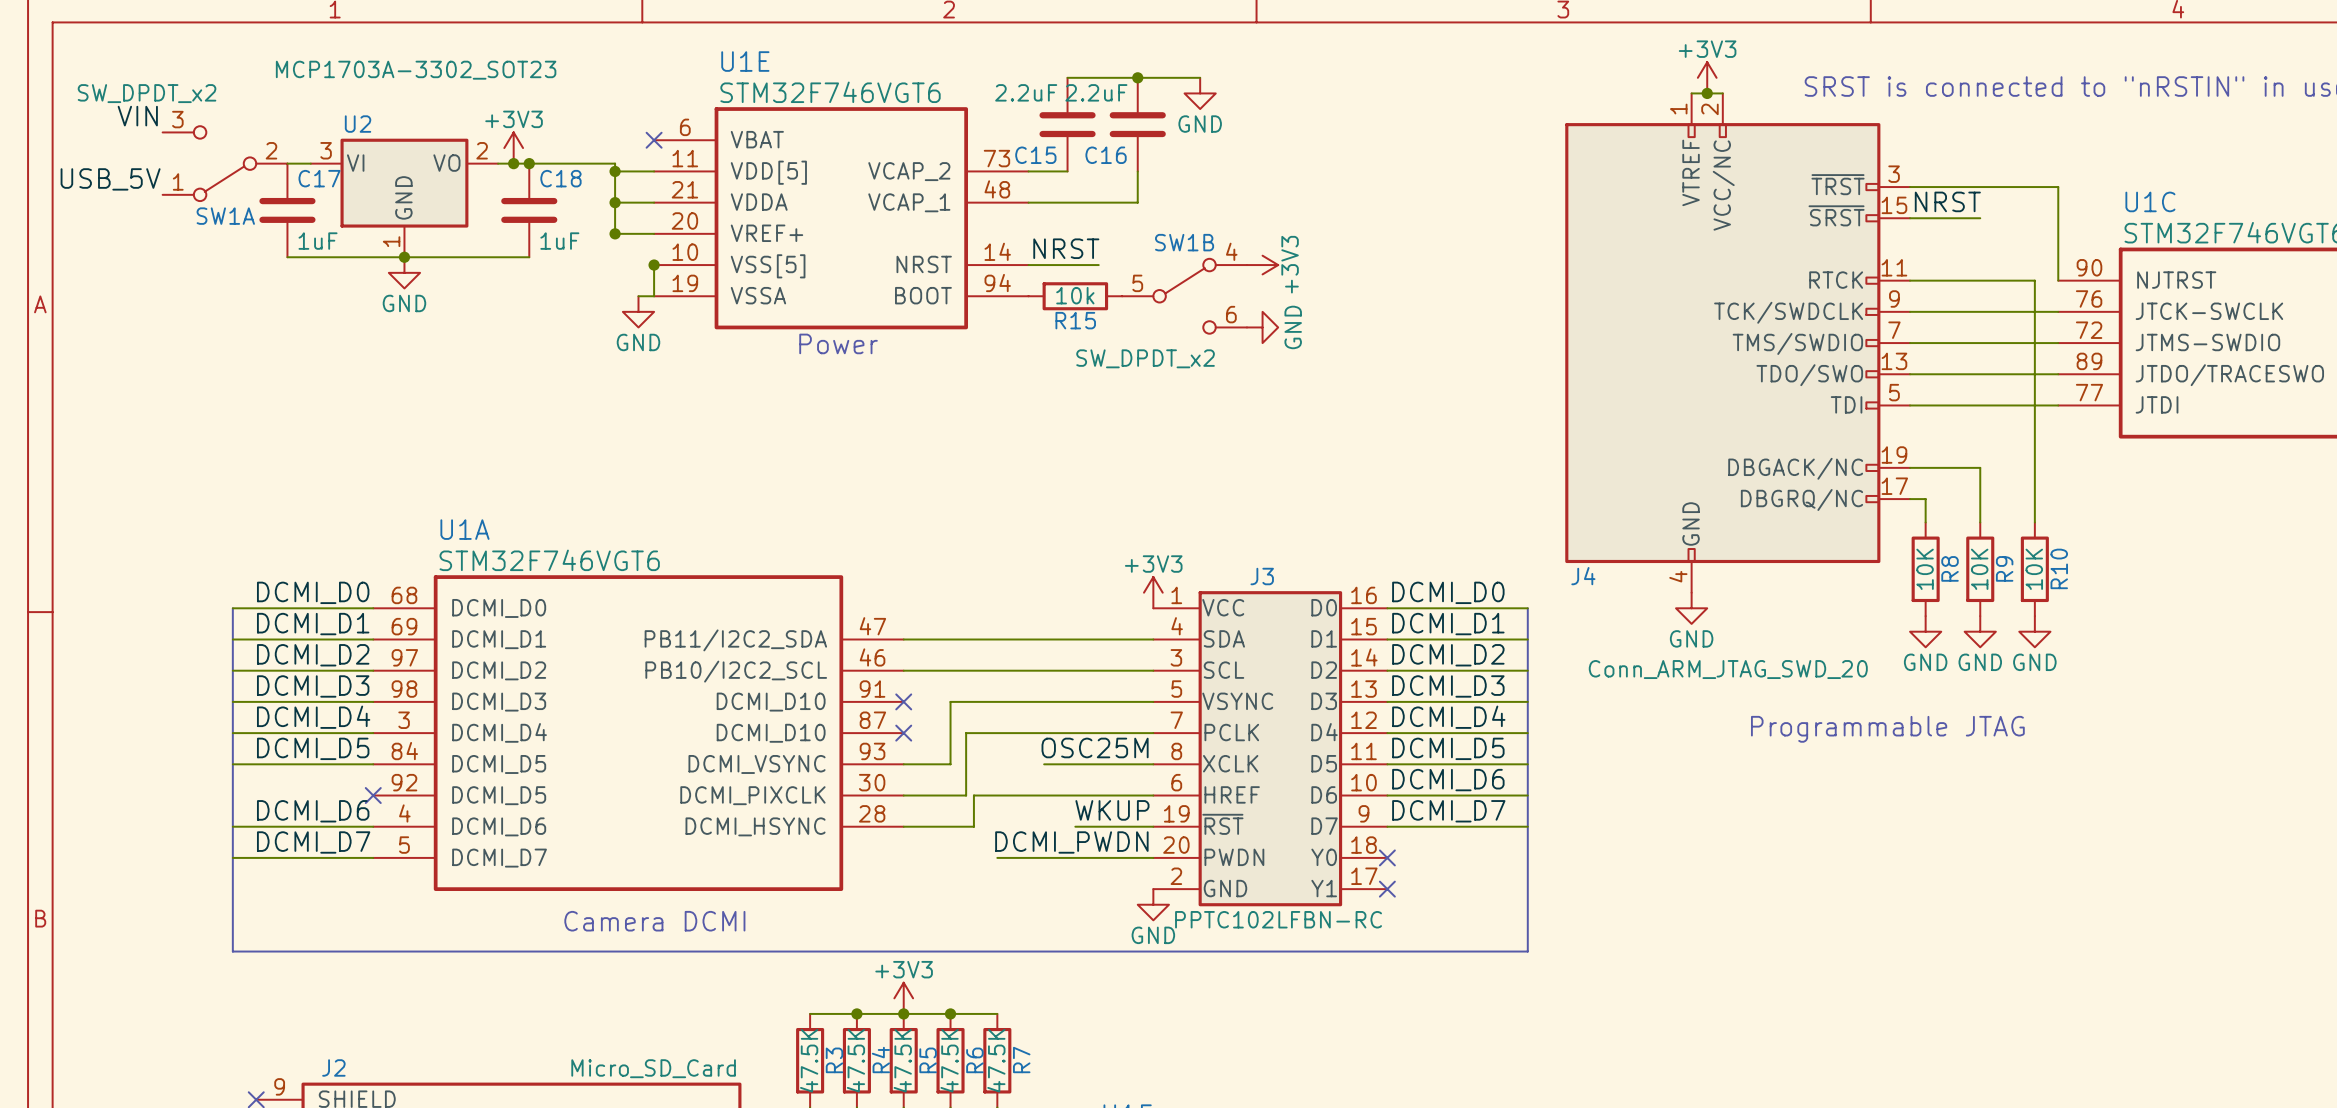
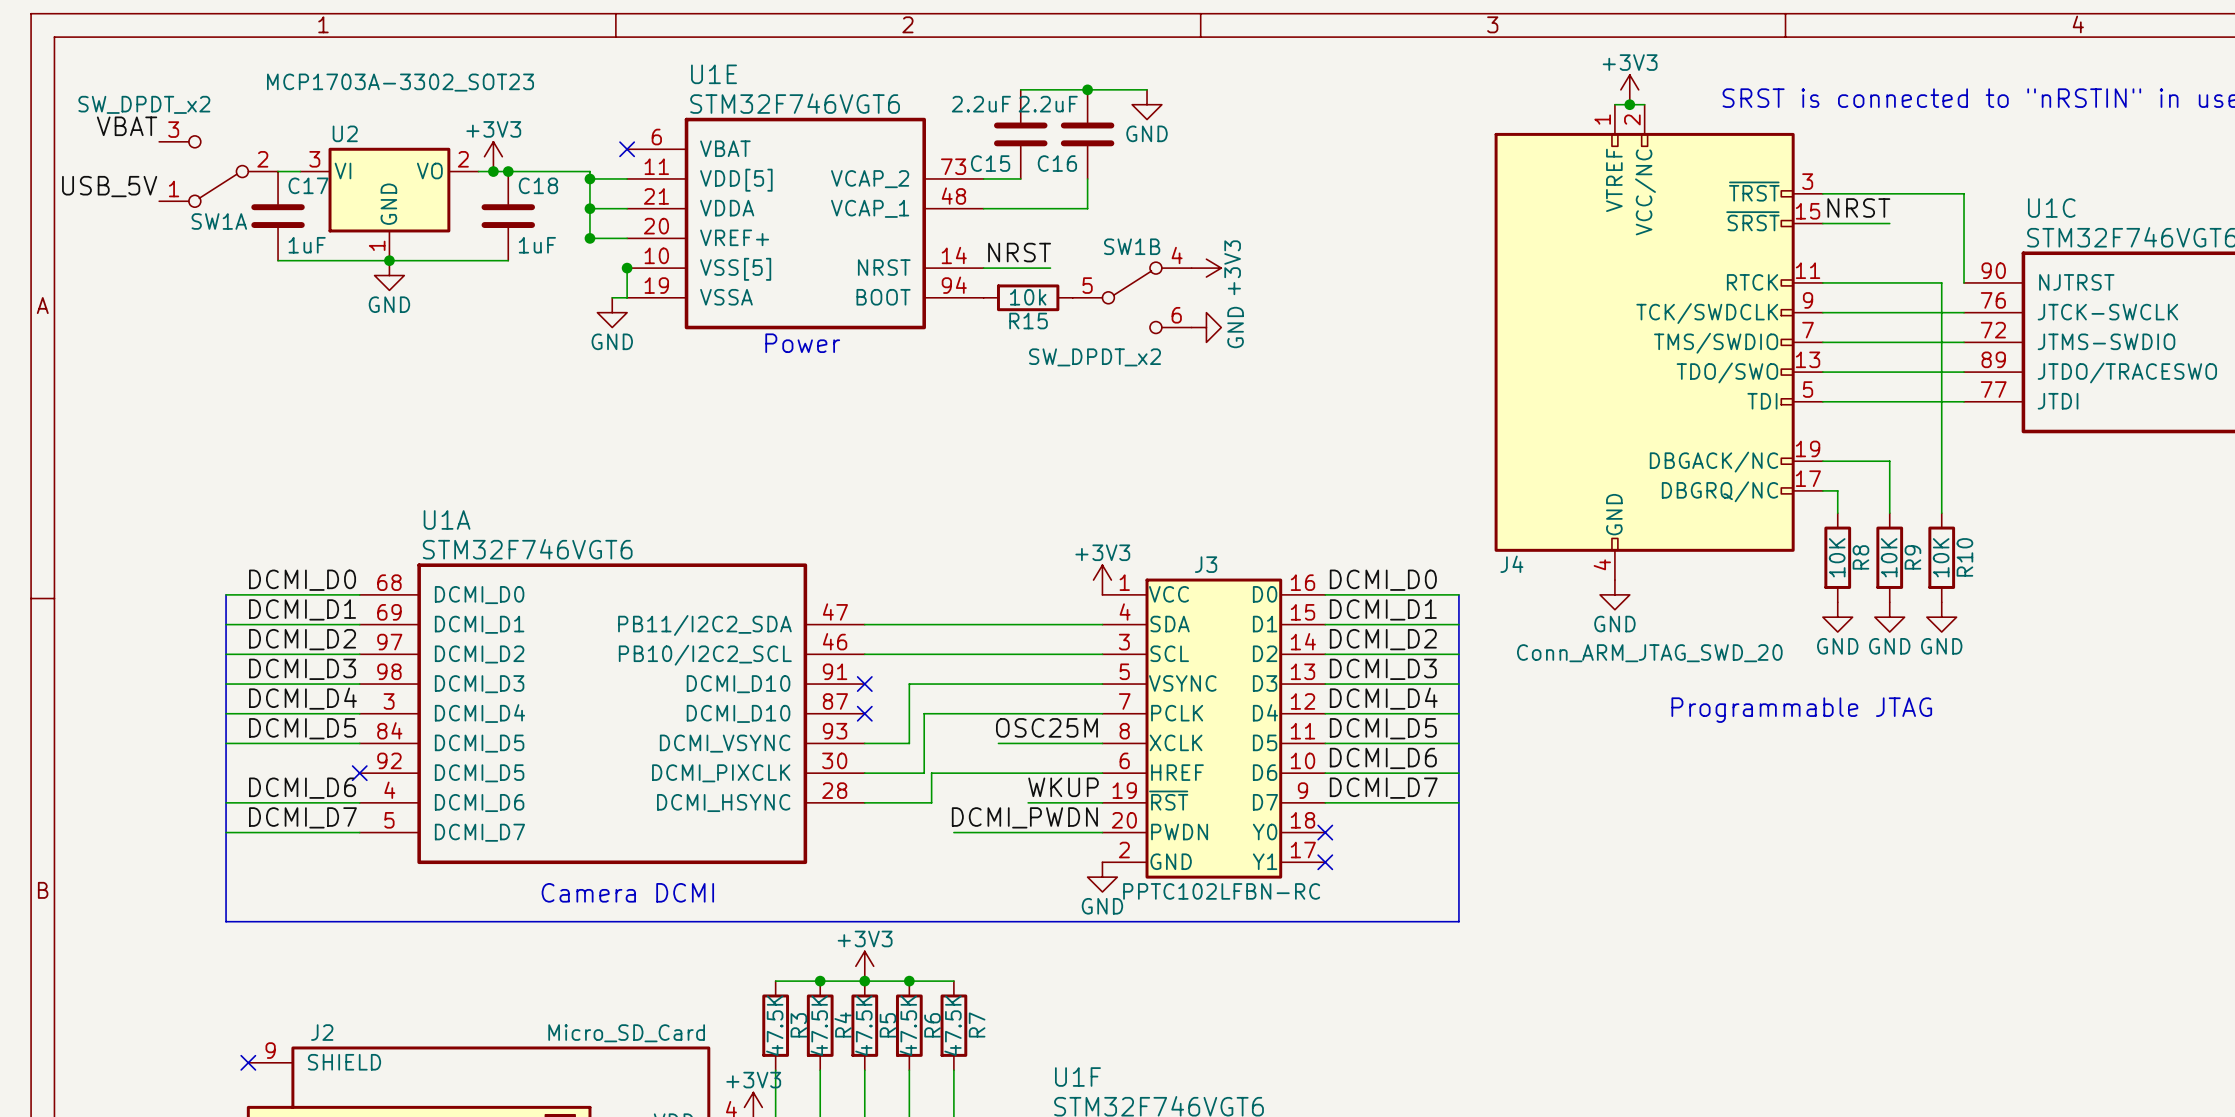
label: VIN (137, 116) -> VBAT (127, 126)

